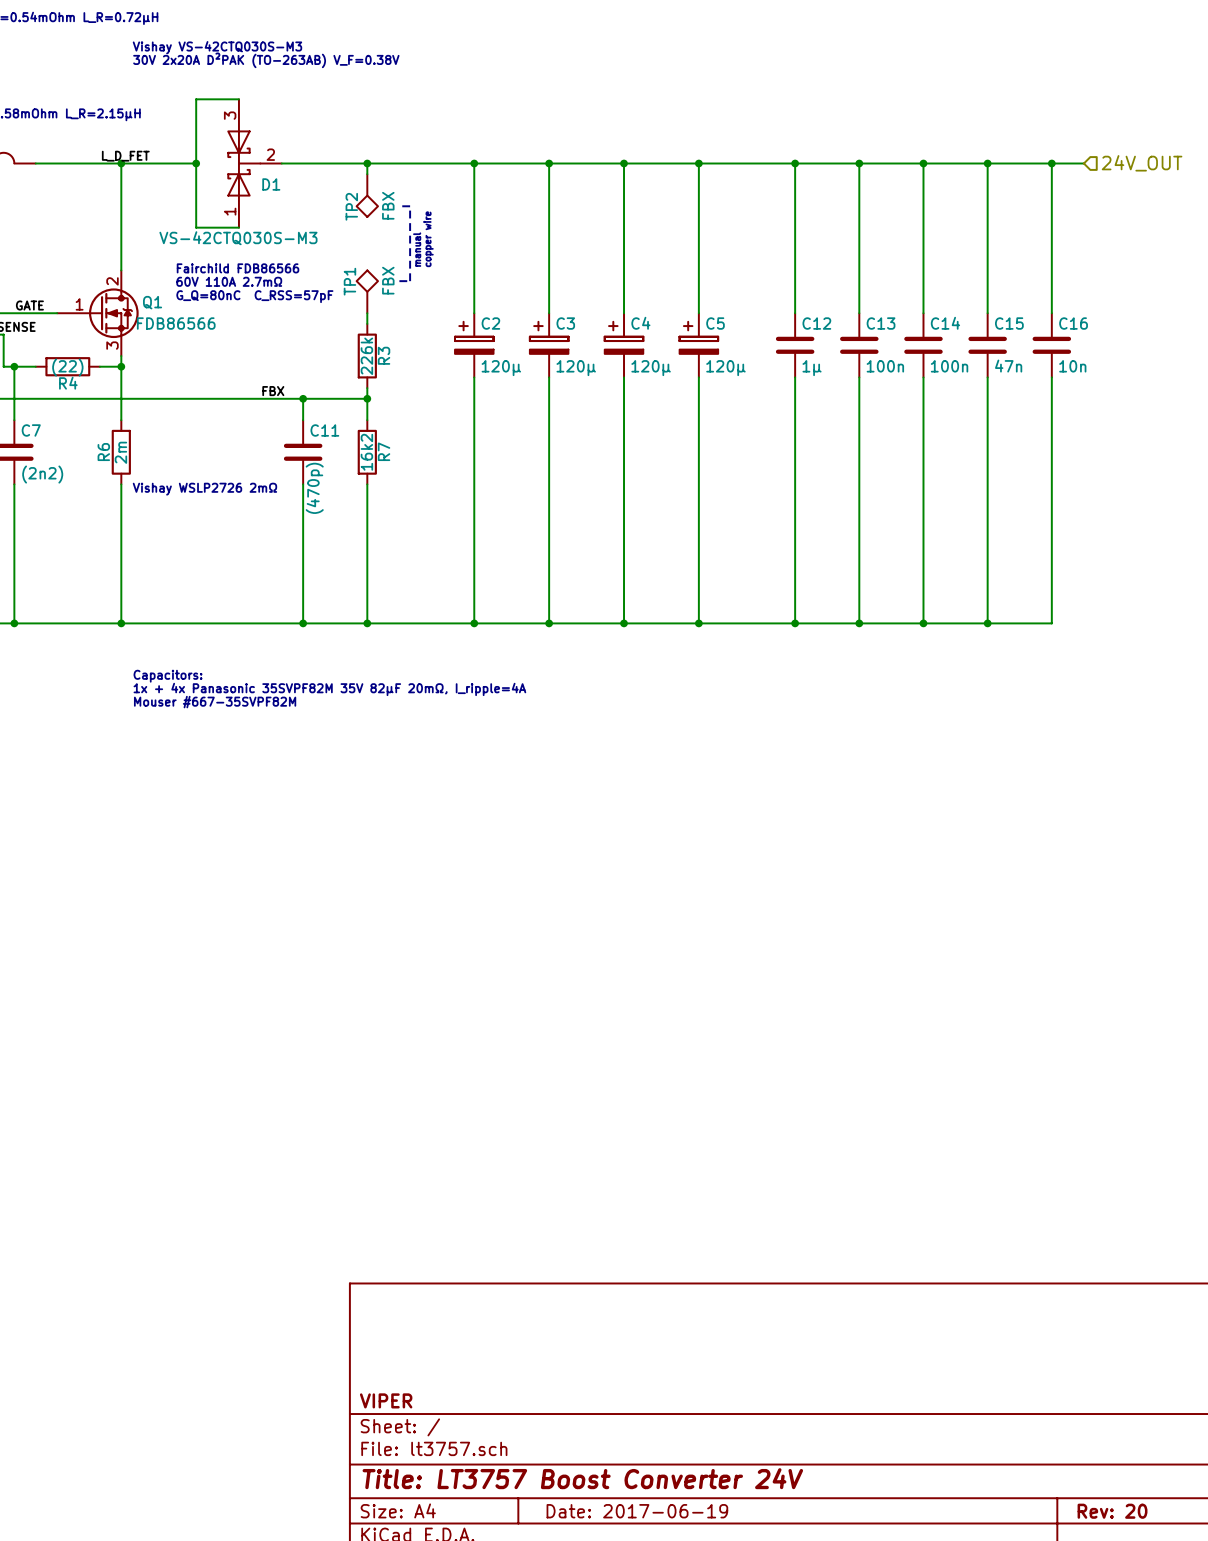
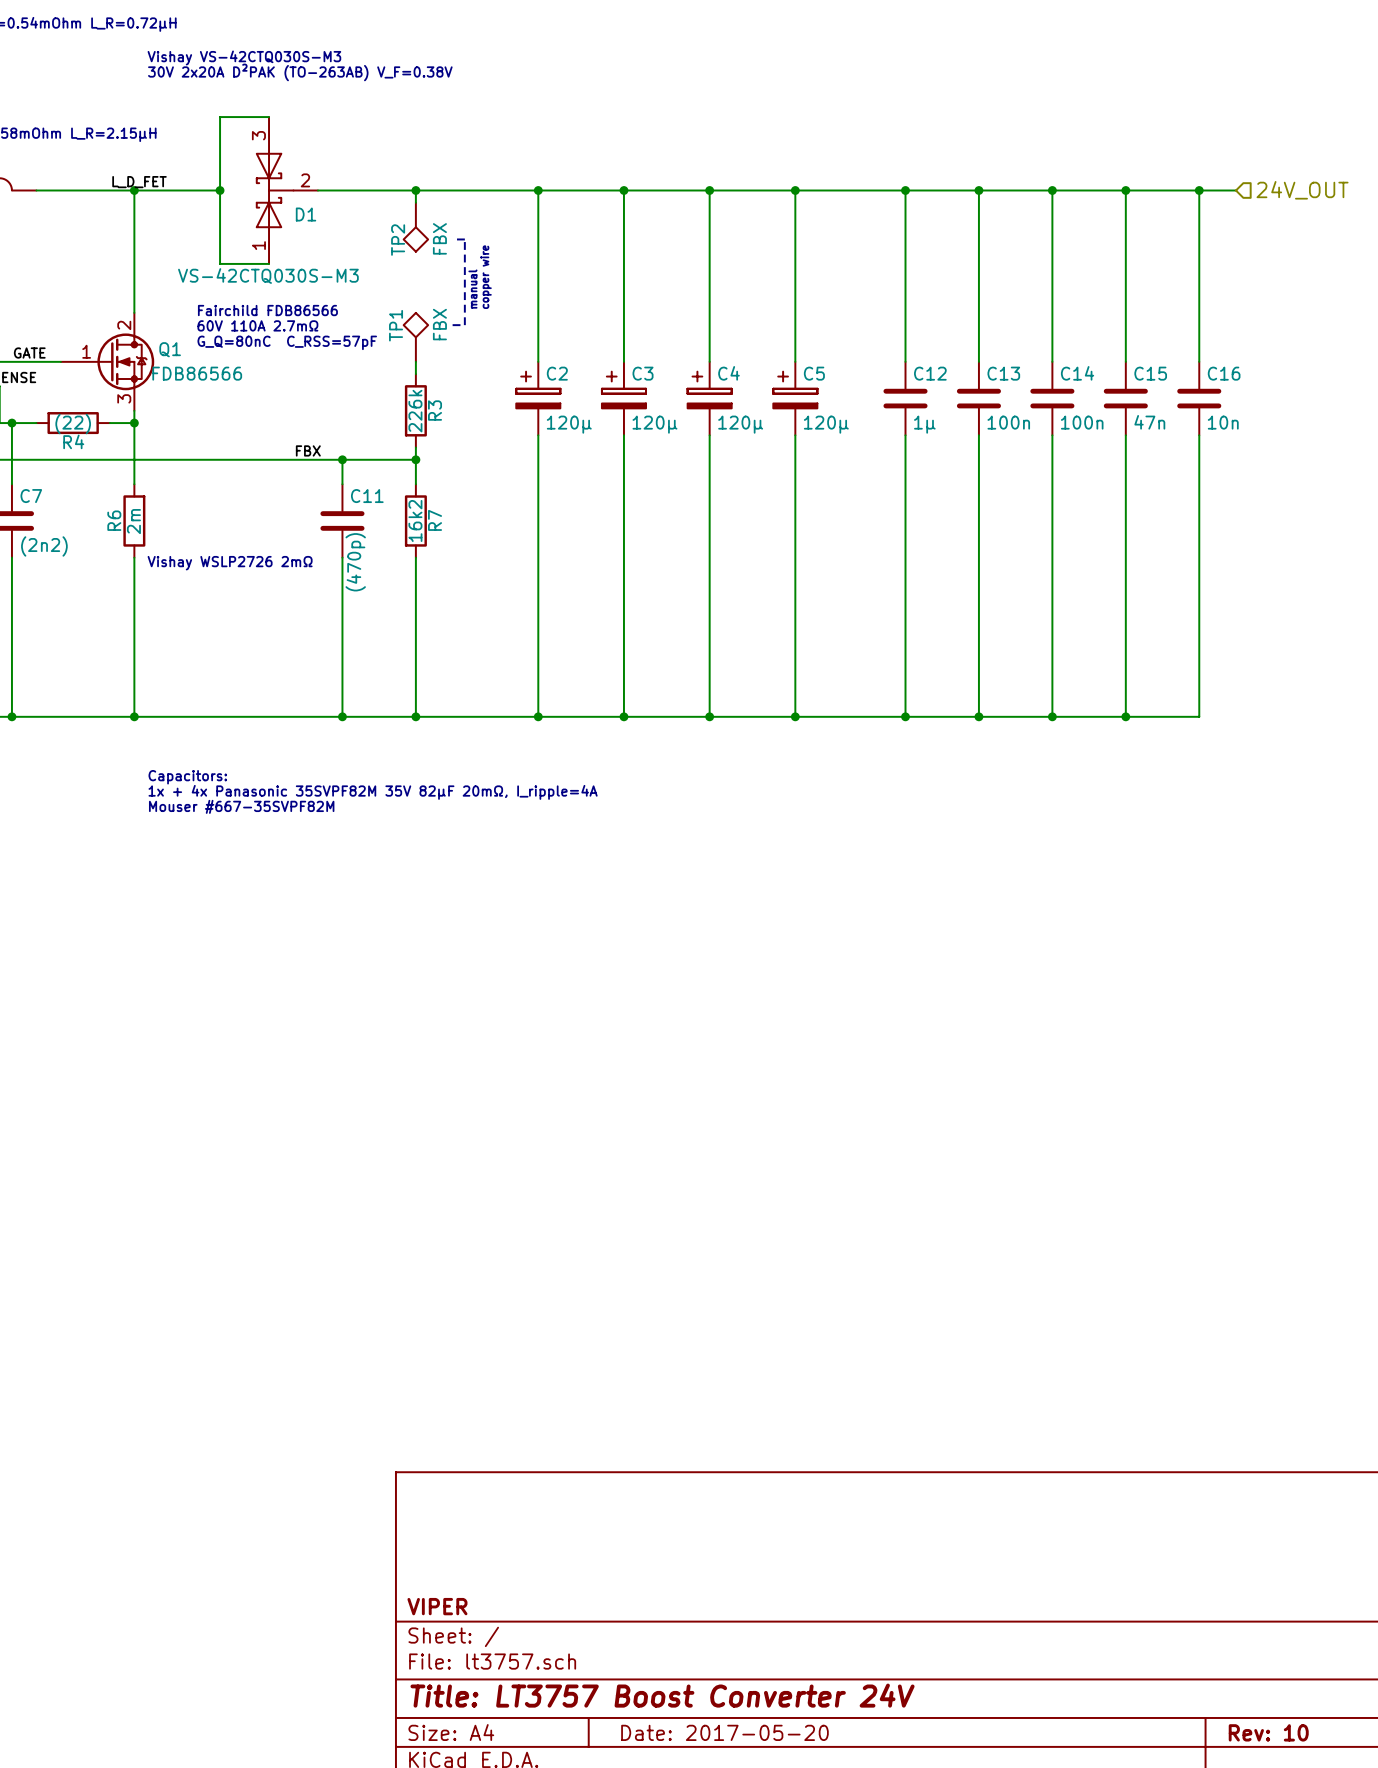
title block: Date: 2017-06-19 (637, 1511) -> Date: 2017-05-20 (724, 1732)
title block: Rev: 20 (1112, 1511) -> Rev: 10 (1268, 1732)

